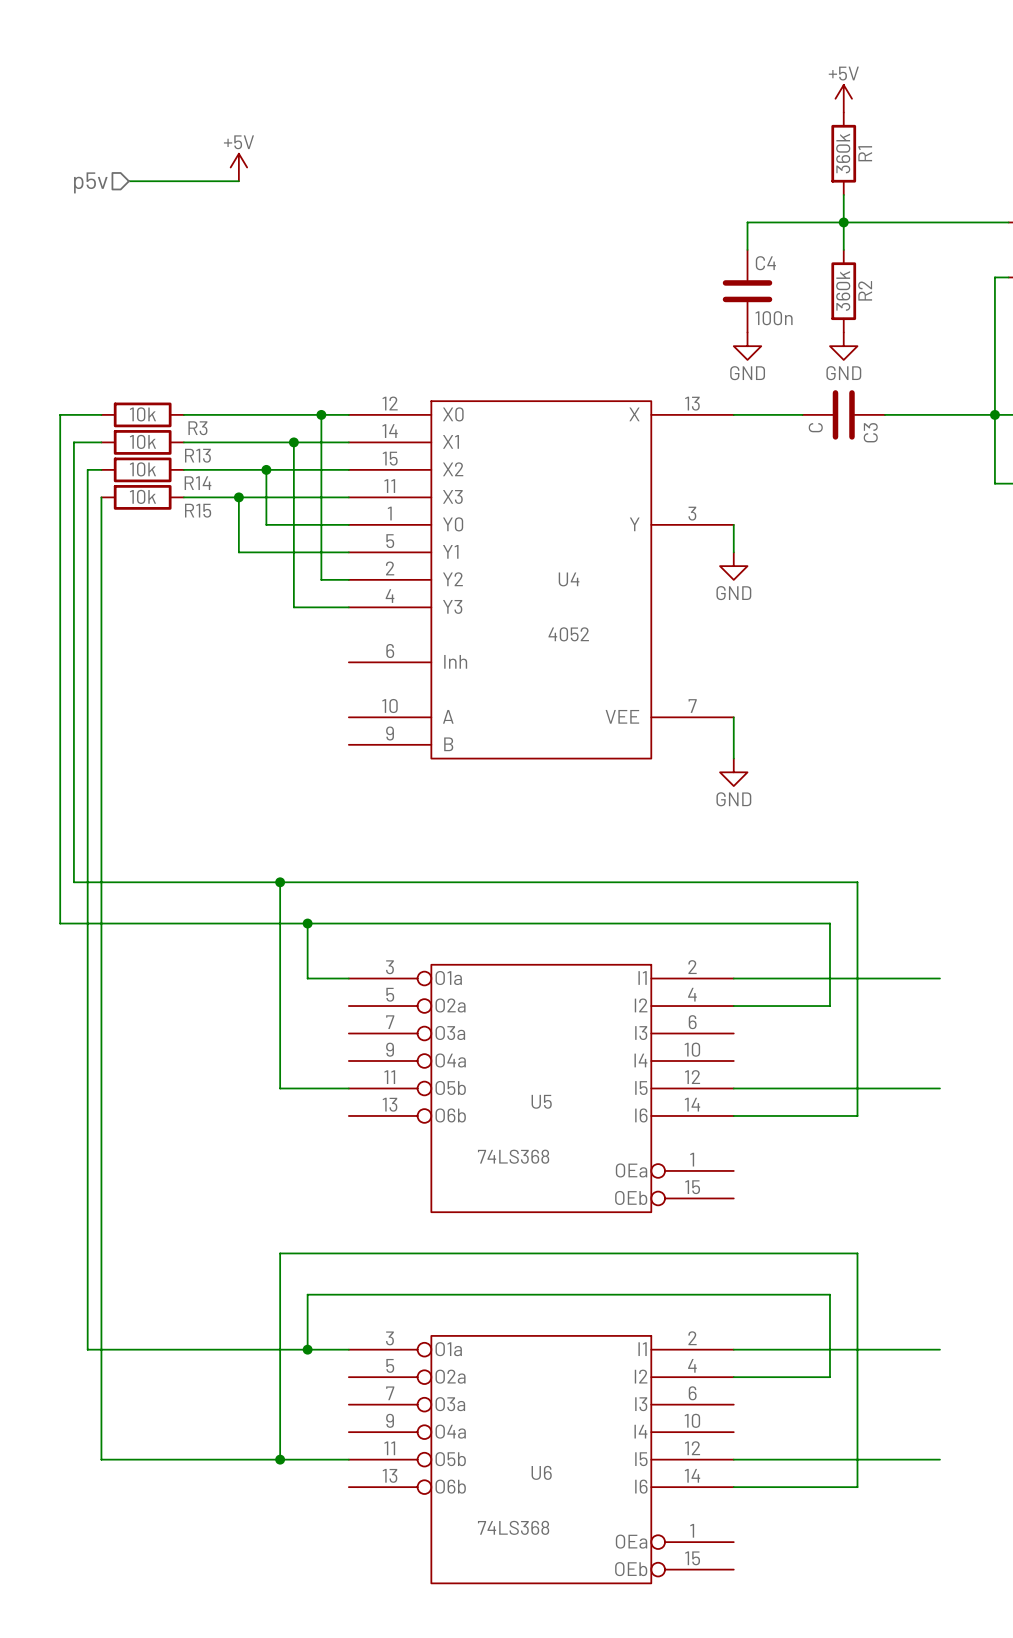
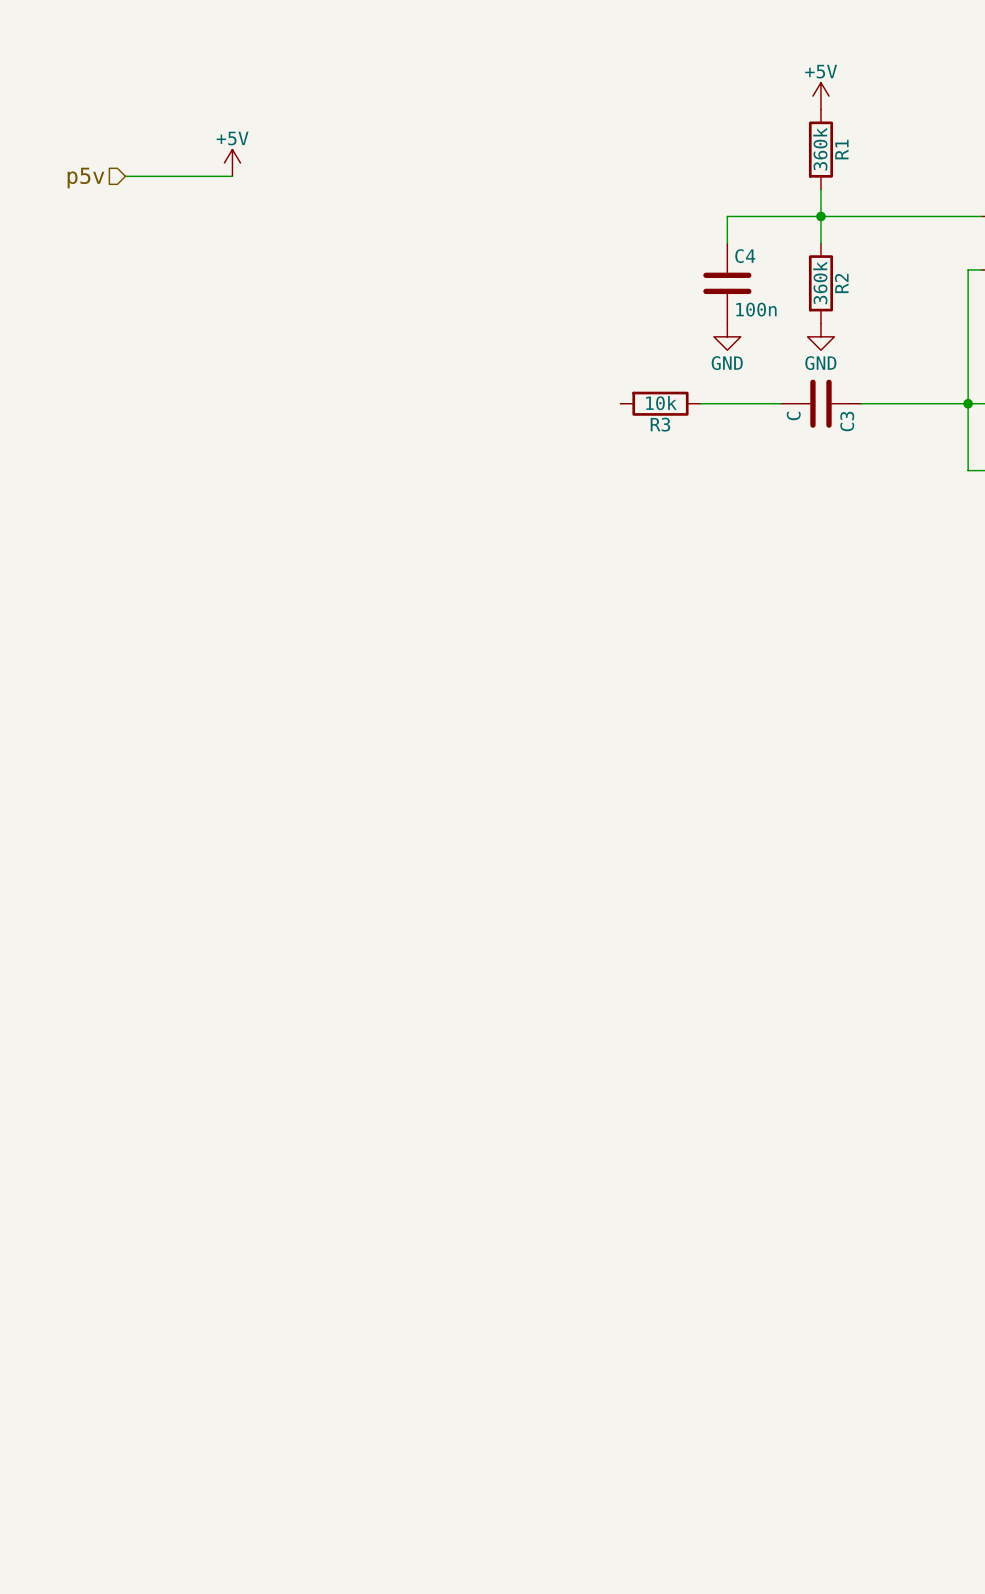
wire: (101, 414) (60, 414) (60, 923) (829, 923) (829, 1006) (733, 1006) -> none
R3 position: (142, 414) -> (660, 403)
wire: (183, 414) (348, 414) -> none
wire: (321, 414) (321, 579) (348, 579) -> none
junction: (321, 414) -> none
R3 name position: R3 (197, 428) -> R3 (660, 424)
wire: (101, 442) (73, 442) (73, 882) (857, 882) (857, 1115) (733, 1115) -> none
R13: 10k (142, 442) -> none
wire: (183, 442) (348, 442) -> none
wire: (293, 442) (293, 607) (348, 607) -> none
junction: (293, 442) -> none
wire: (101, 469) (87, 469) (87, 1349) (348, 1349) -> none
R14: 10k (142, 469) -> none
wire: (183, 469) (348, 469) -> none
wire: (266, 469) (266, 524) (348, 524) -> none
junction: (266, 469) -> none
wire: (101, 497) (101, 1459) (348, 1459) -> none
R15: 10k (142, 497) -> none
wire: (183, 497) (348, 497) -> none
wire: (238, 497) (238, 552) (348, 552) -> none
junction: (238, 497) -> none
wire: (733, 524) (733, 552) -> none
power symbol: GND (733, 566) -> none
U4: 4052 (541, 579) -> none
wire: (733, 717) (733, 758) -> none
power symbol: GND (733, 772) -> none
wire: (280, 882) (280, 1088) (348, 1088) -> none
junction: (280, 882) -> none
wire: (307, 923) (307, 978) (348, 978) -> none
junction: (307, 923) -> none
wire: (733, 978) (939, 978) -> none
U5: 74LS368 (541, 1088) -> none
wire: (733, 1088) (939, 1088) -> none
wire: (307, 1349) (307, 1294) (829, 1294) (829, 1377) (733, 1377) -> none
junction: (307, 1349) -> none
wire: (733, 1349) (939, 1349) -> none
wire: (280, 1459) (280, 1253) (857, 1253) (857, 1487) (733, 1487) -> none
junction: (280, 1459) -> none
U6: 74LS368 (541, 1459) -> none
wire: (733, 1459) (939, 1459) -> none

